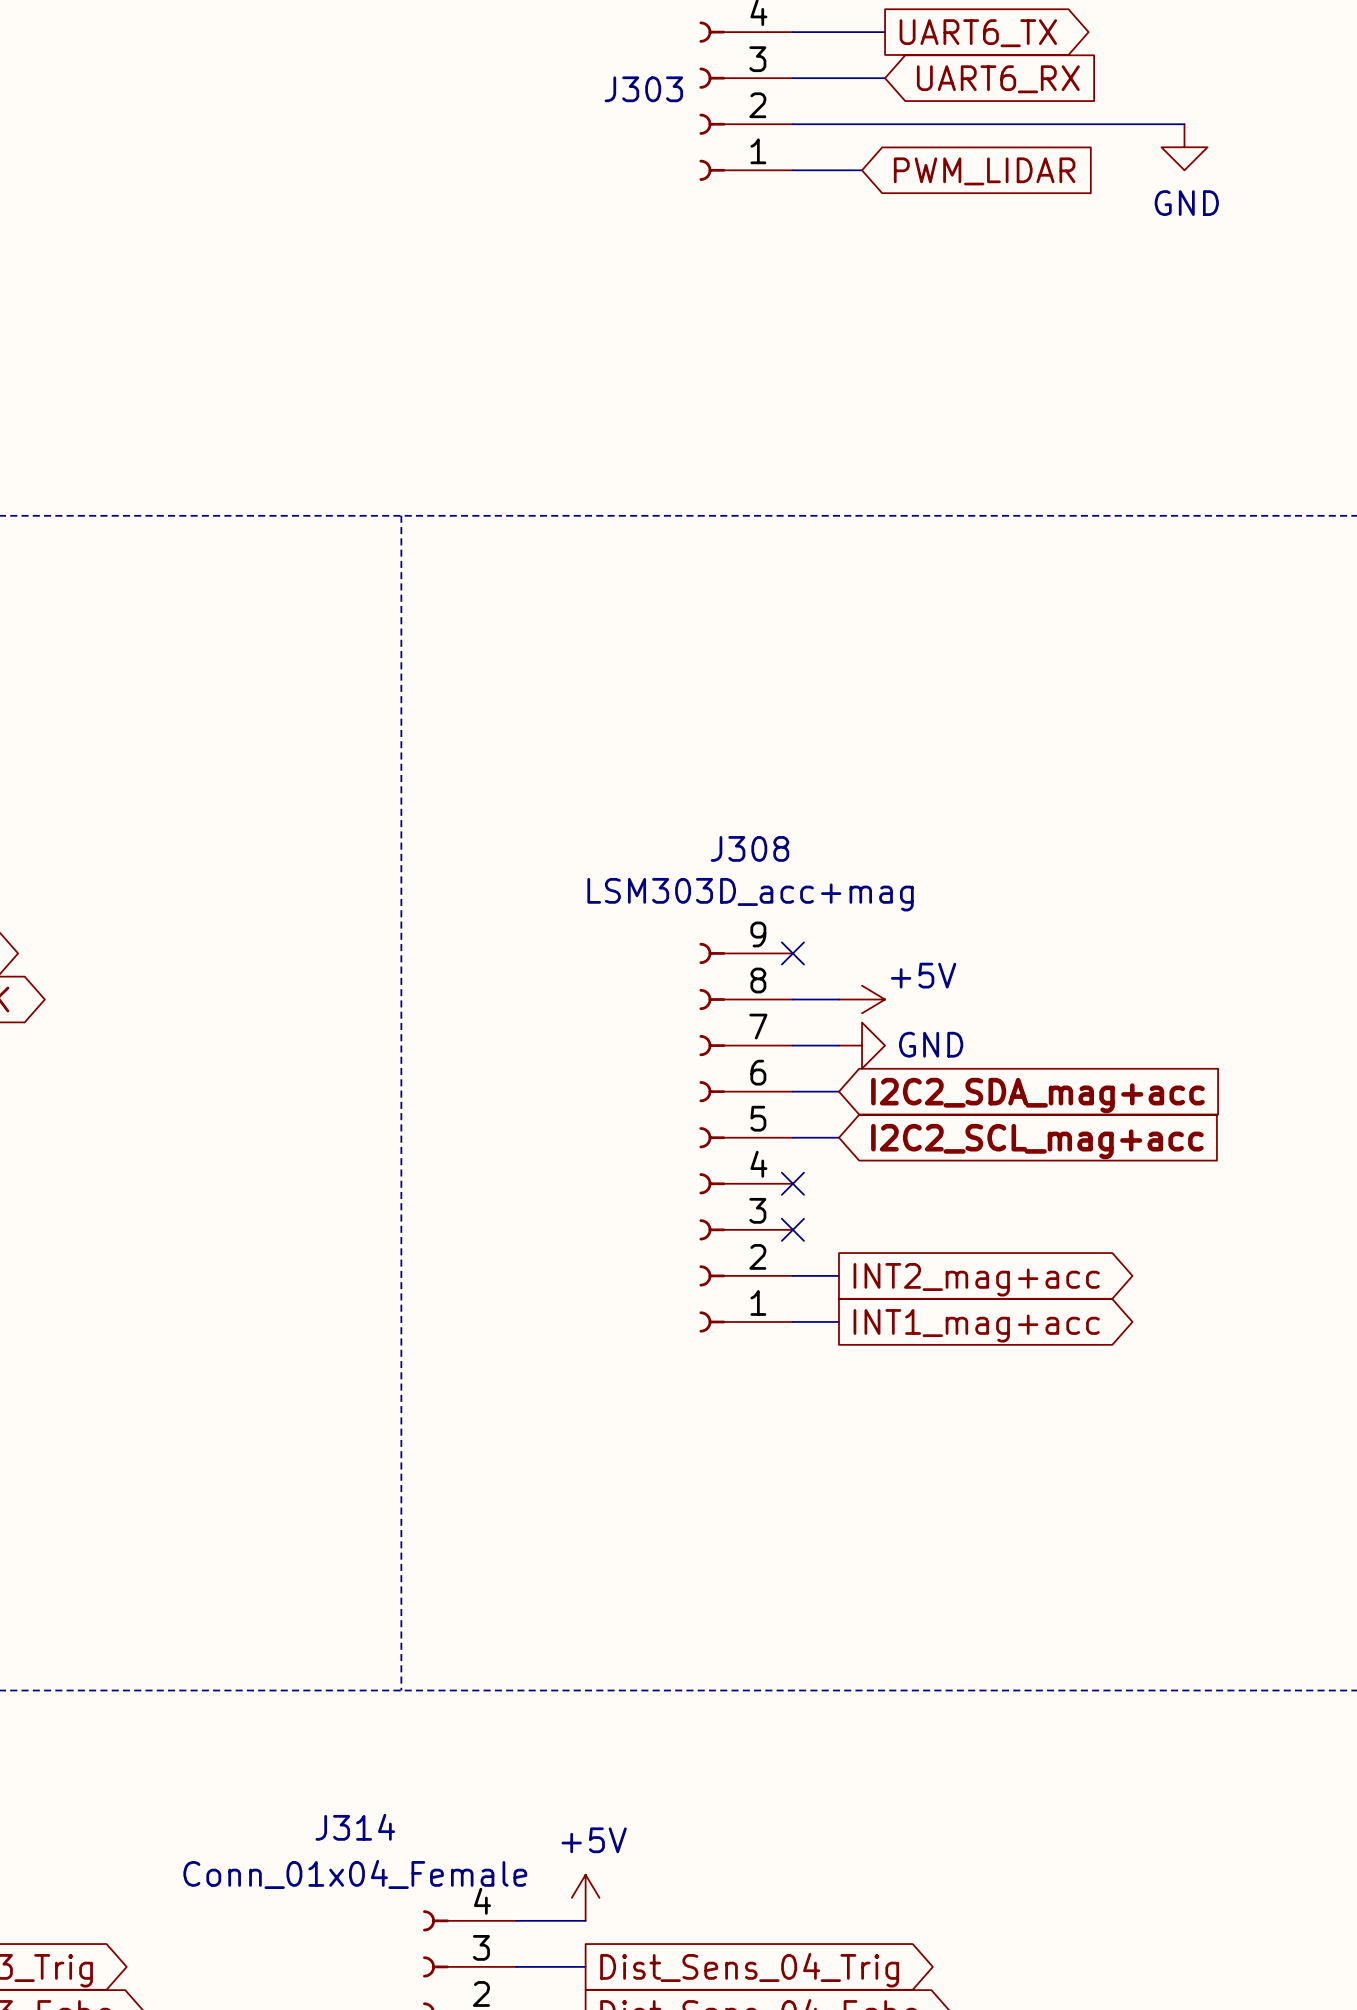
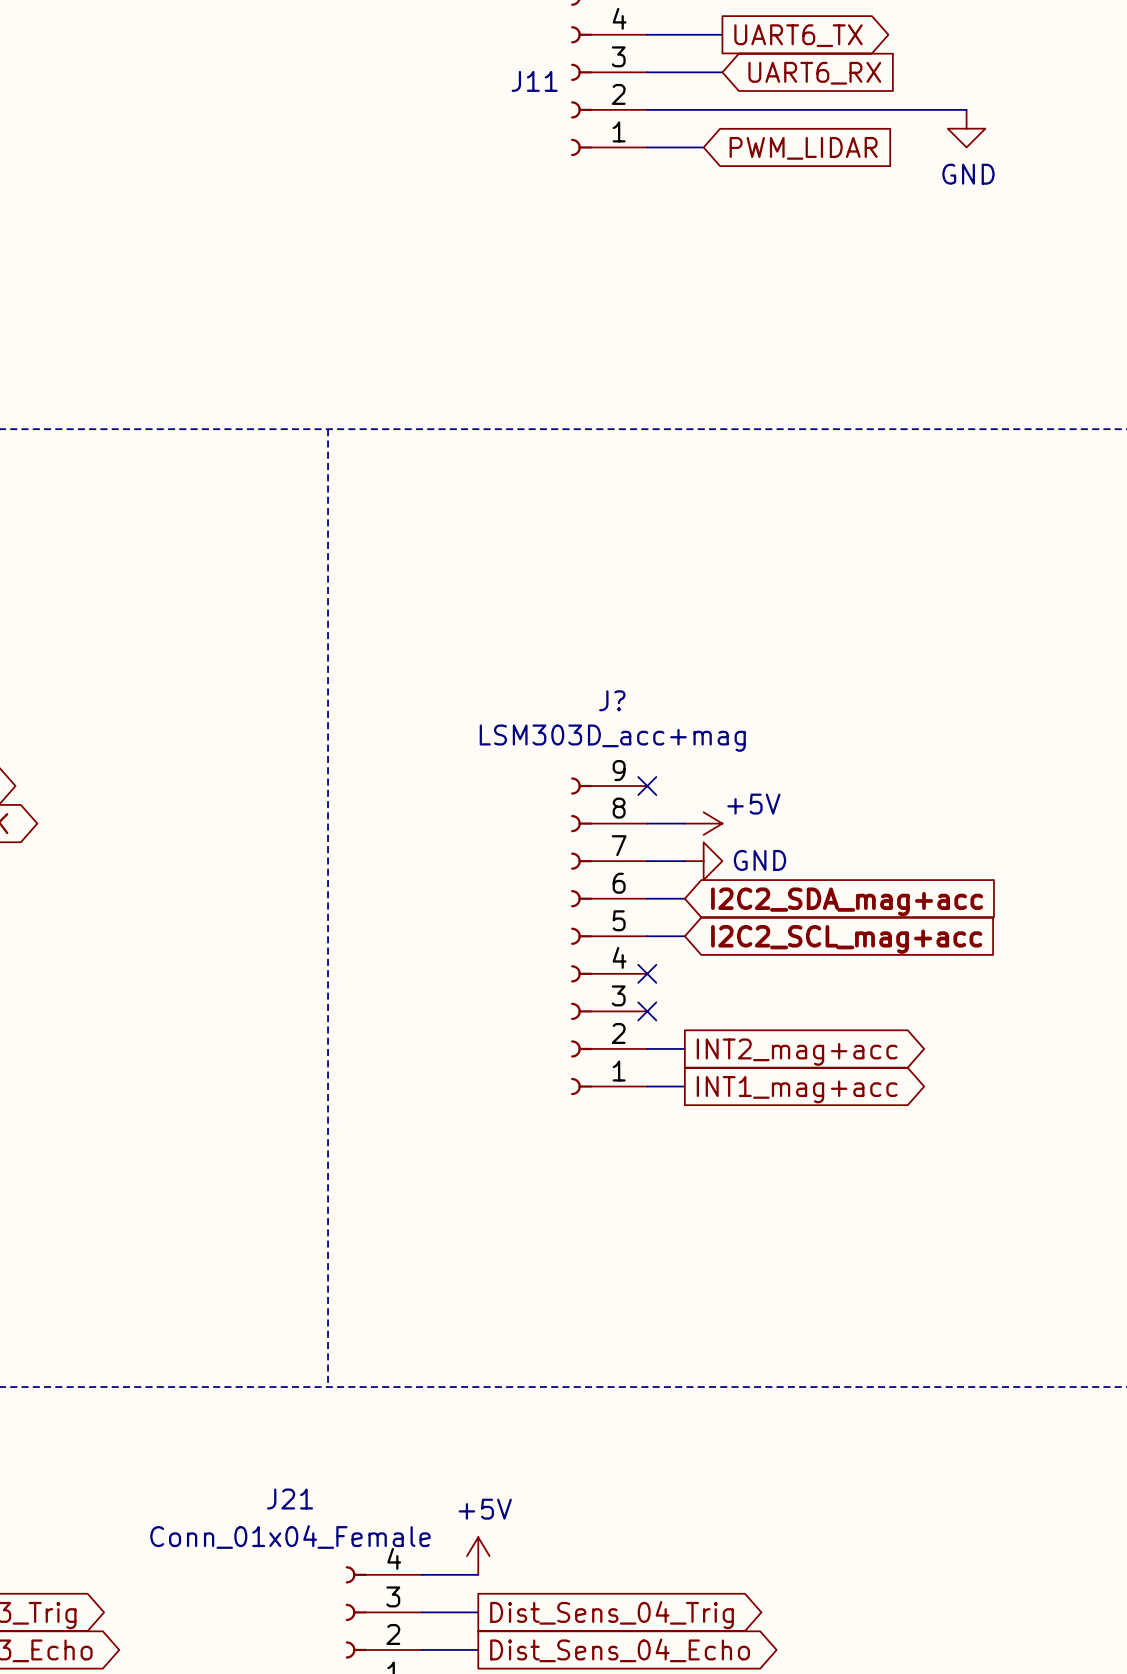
J303 name: J303 (643, 89) -> J11 (534, 81)
J308 name: J308 (749, 848) -> J? (612, 700)
J314 name: J314 (355, 1827) -> J21 (290, 1499)

